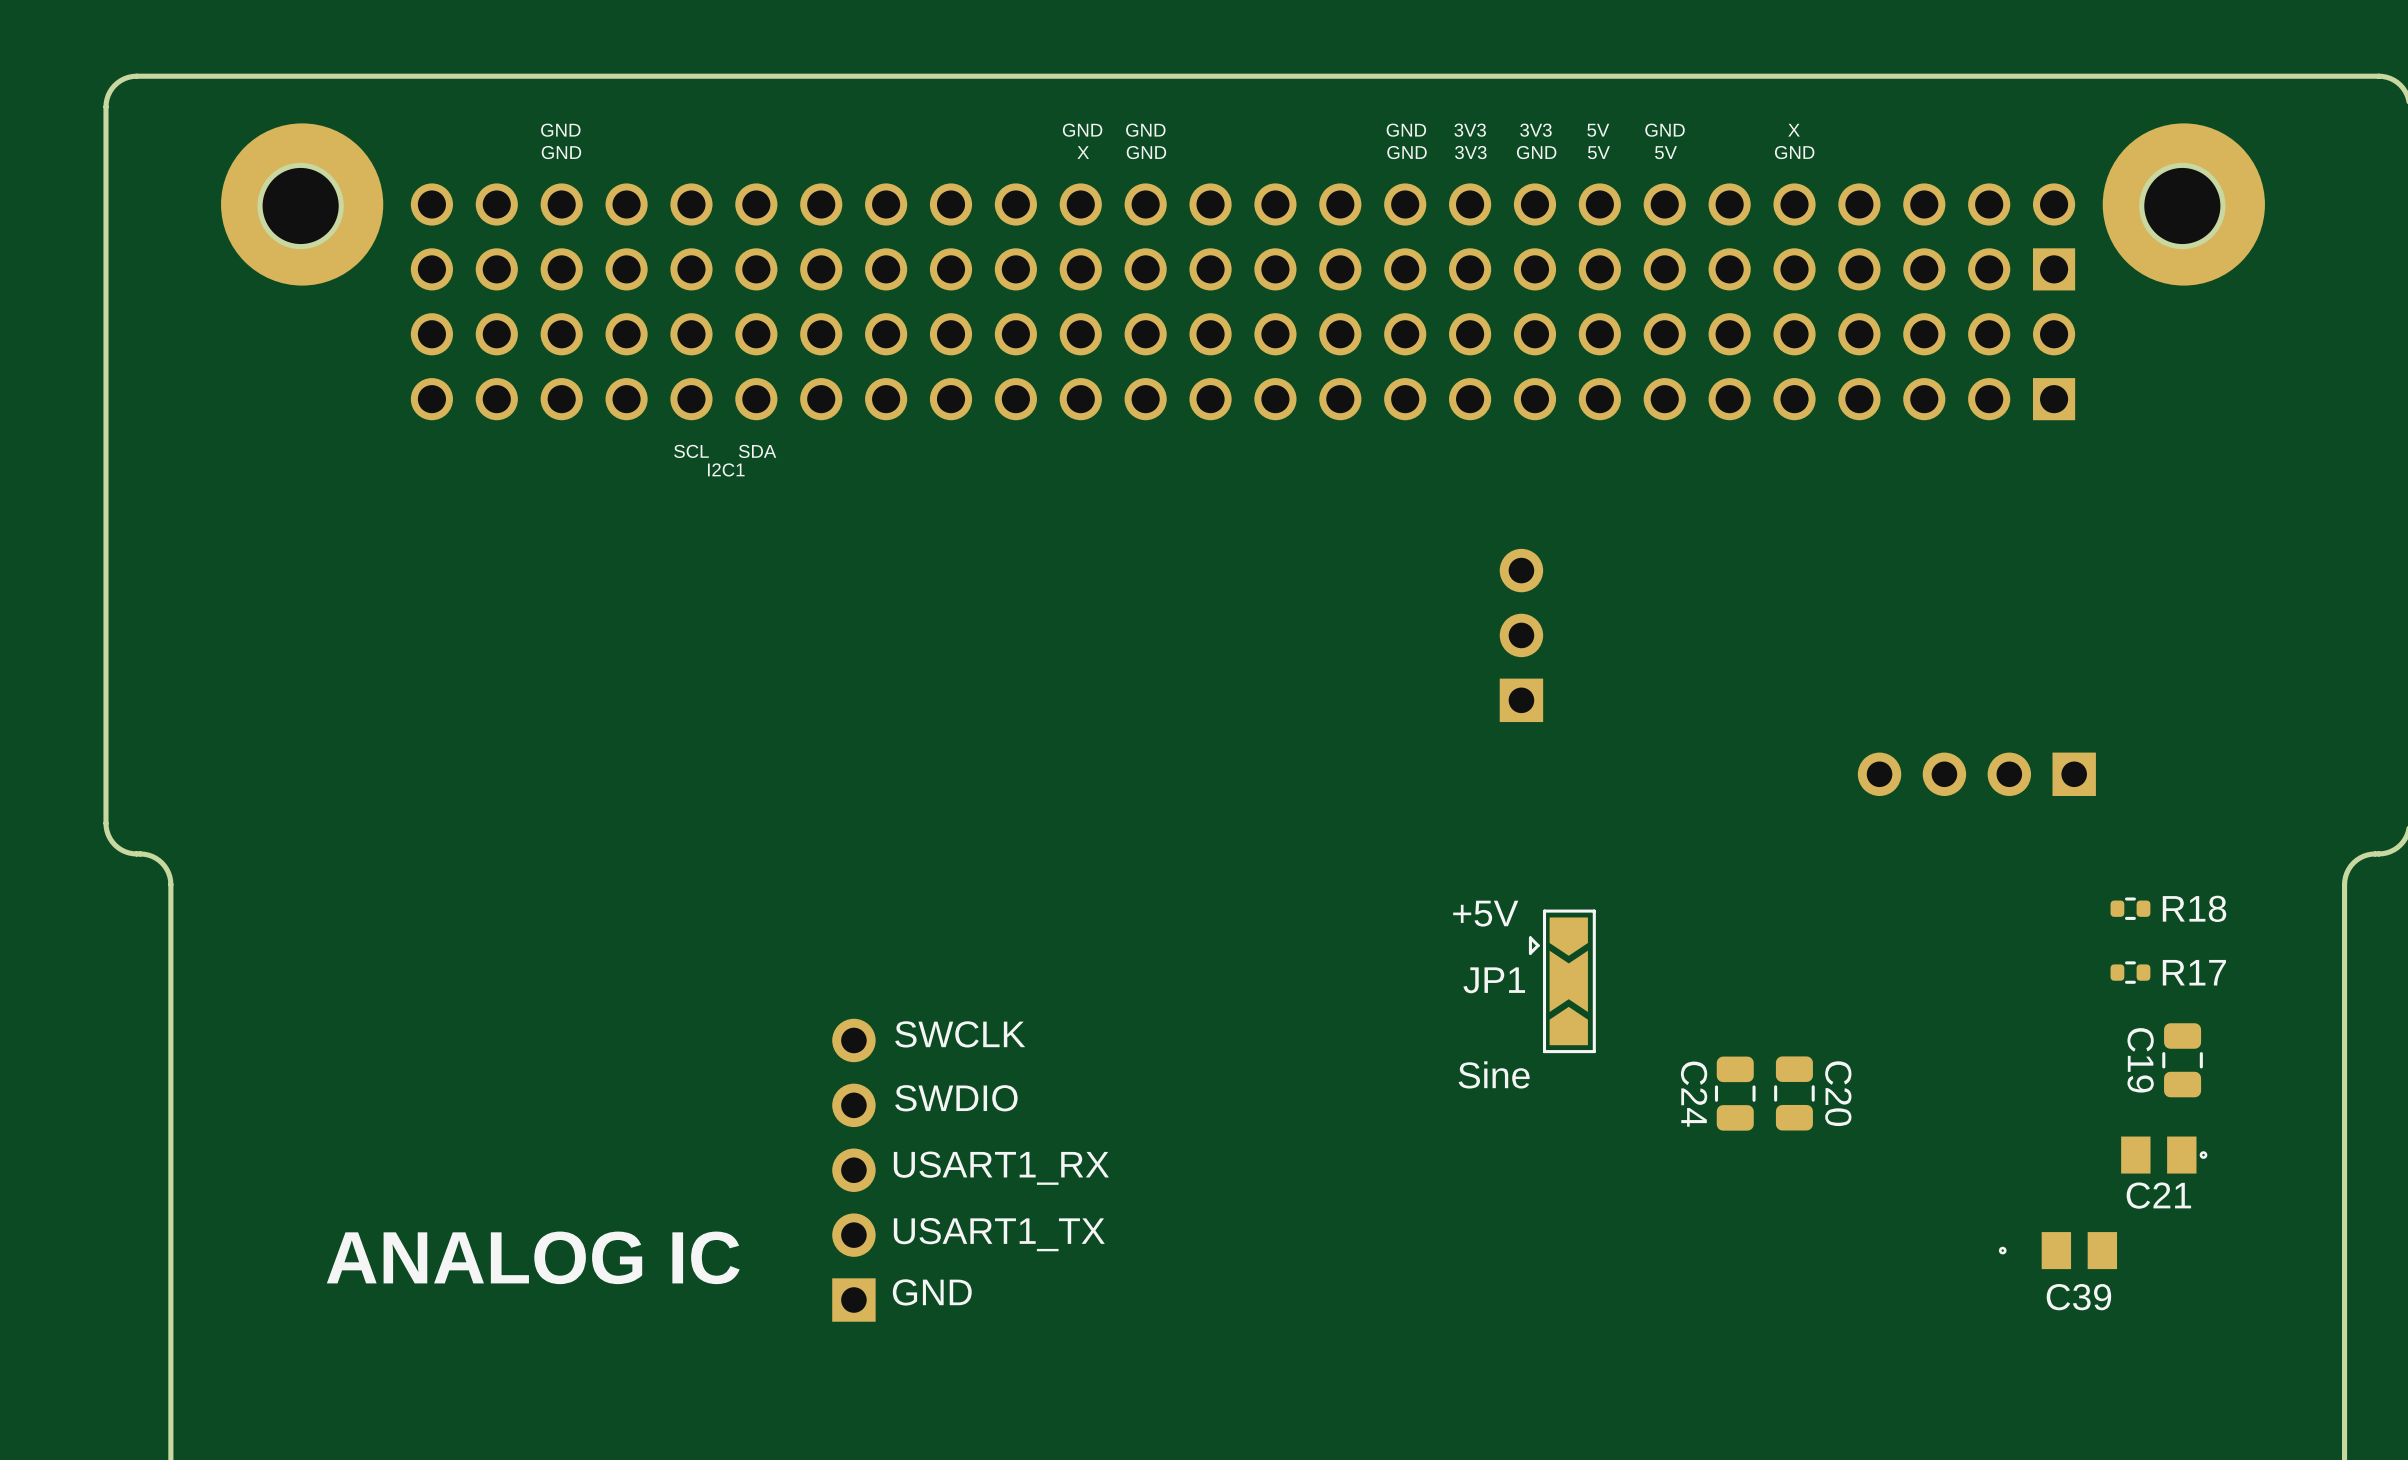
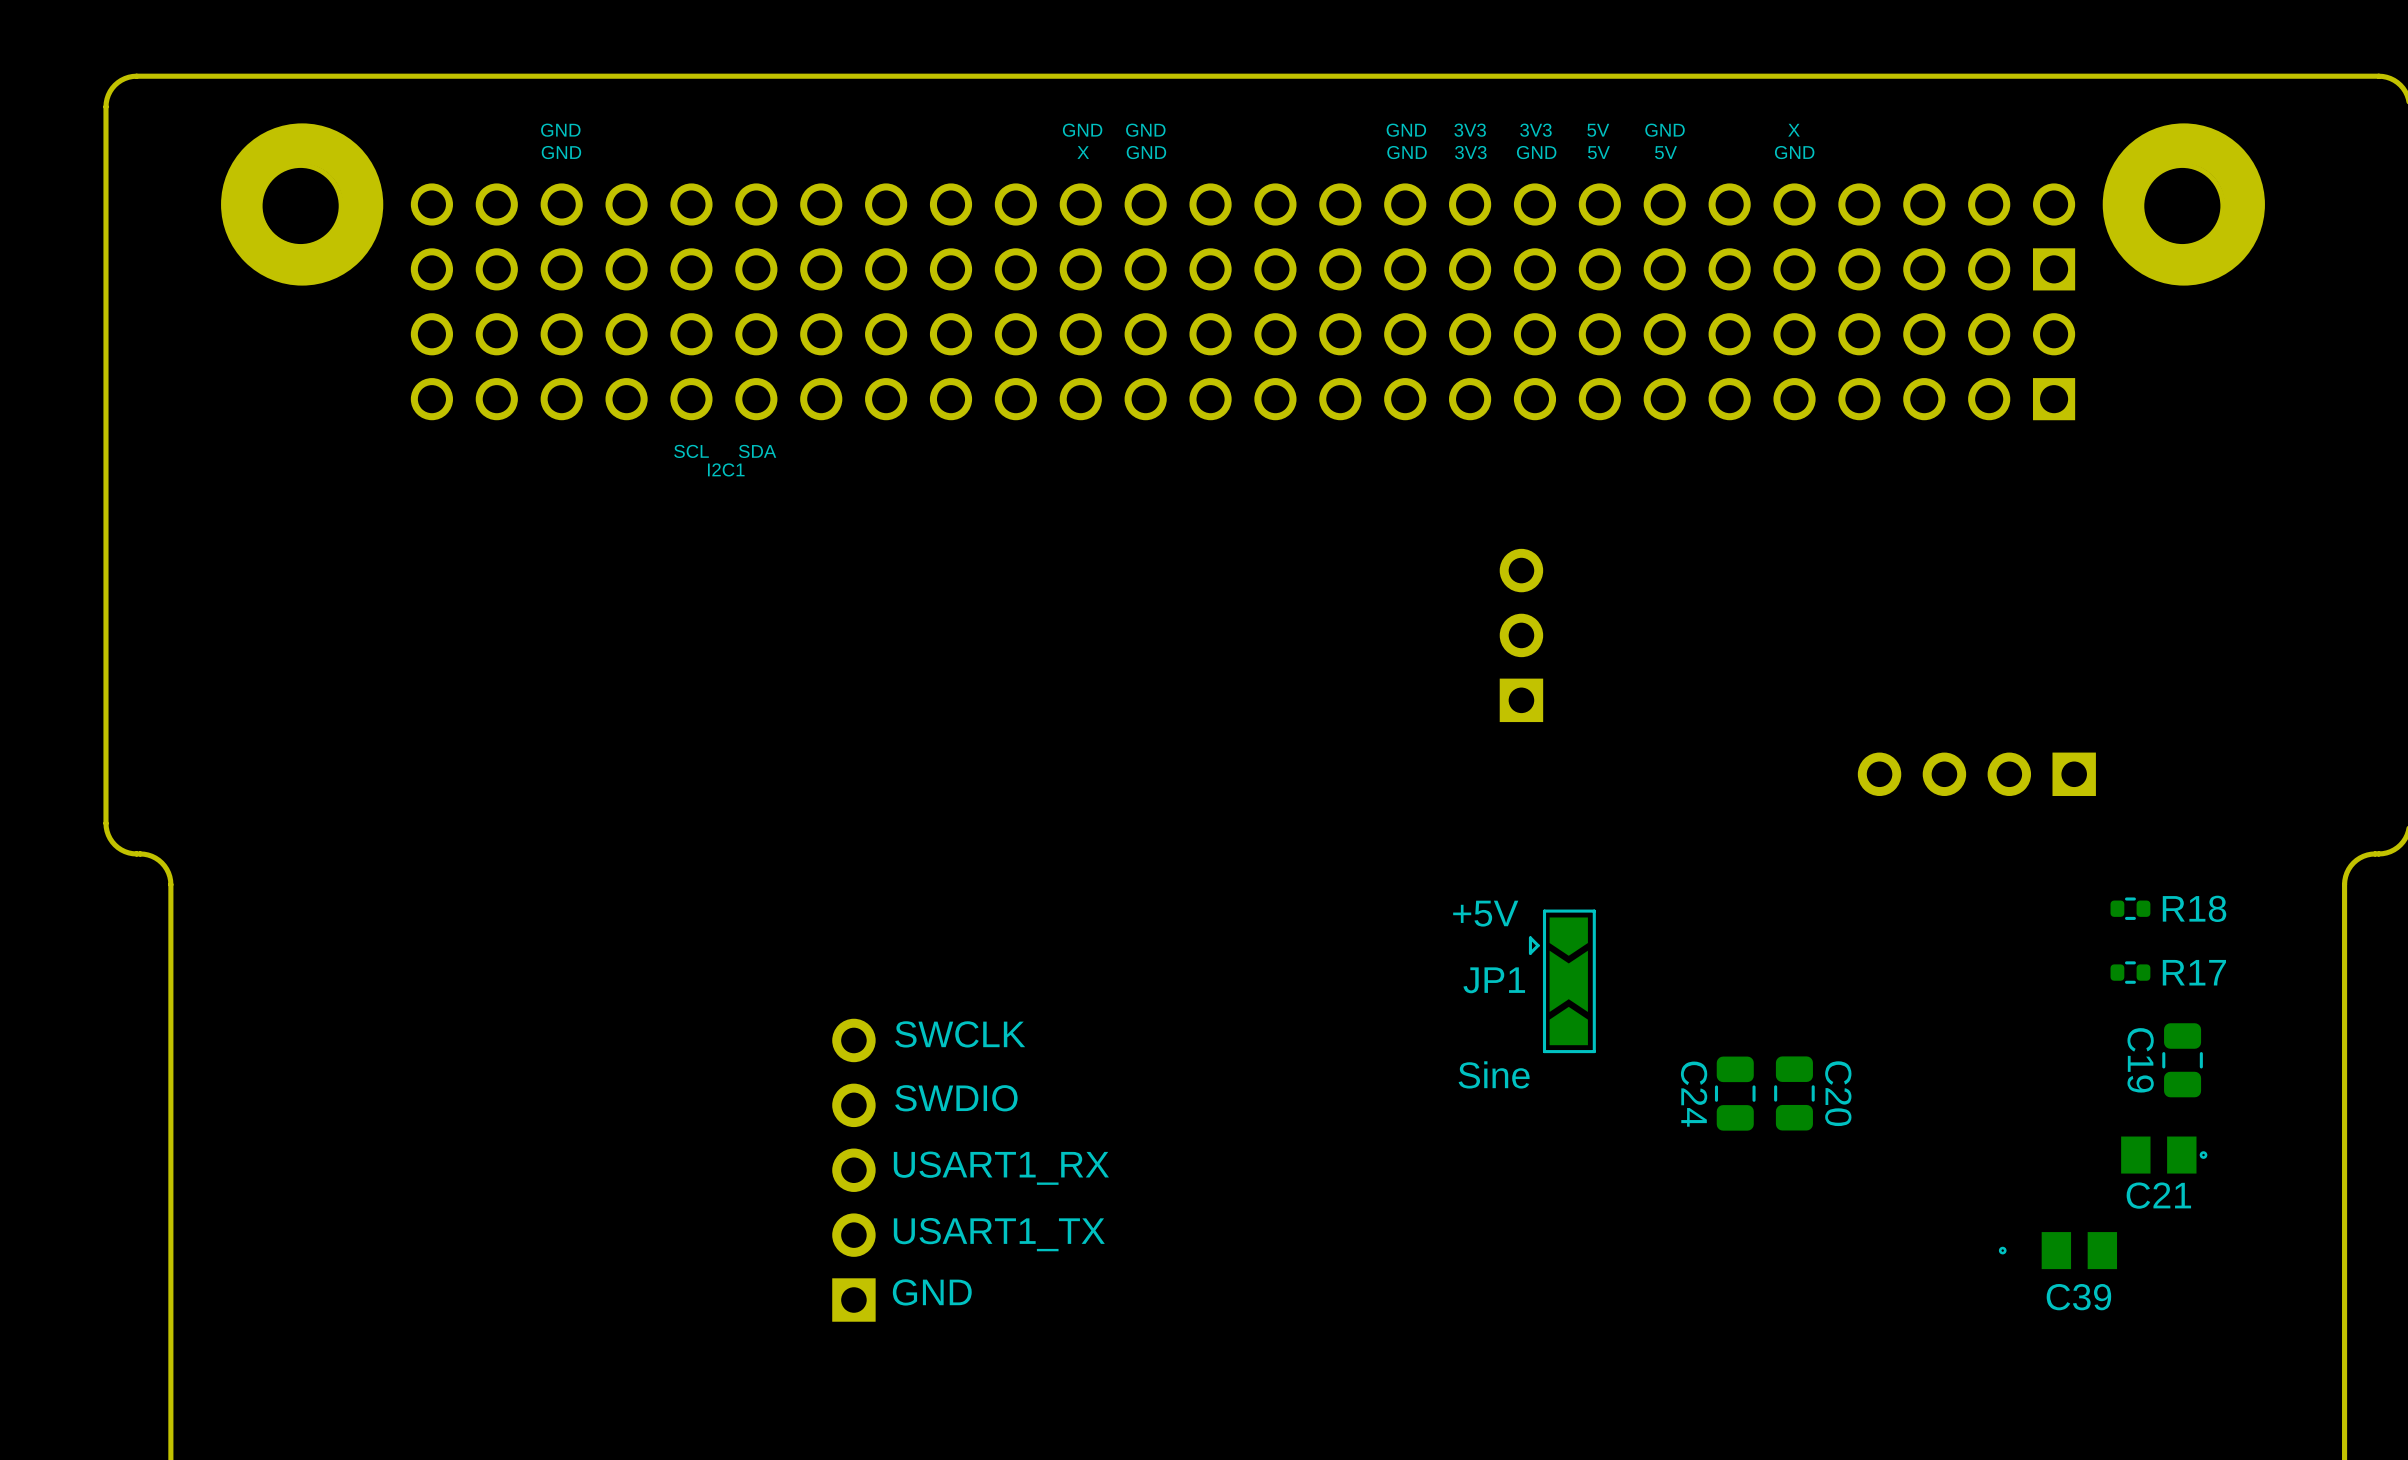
text: ANALOG IC (533, 1257) -> none

